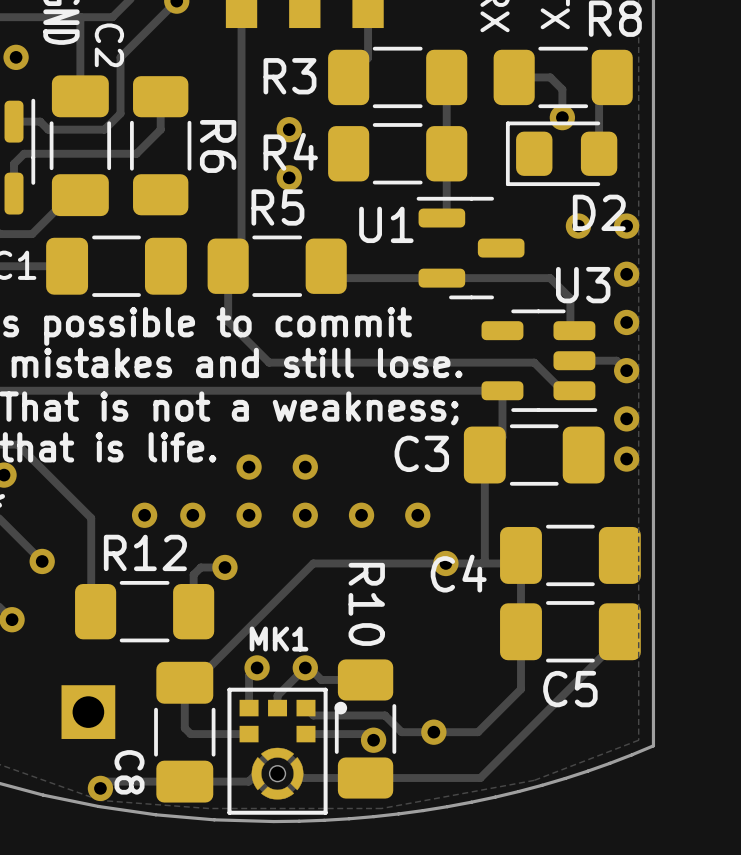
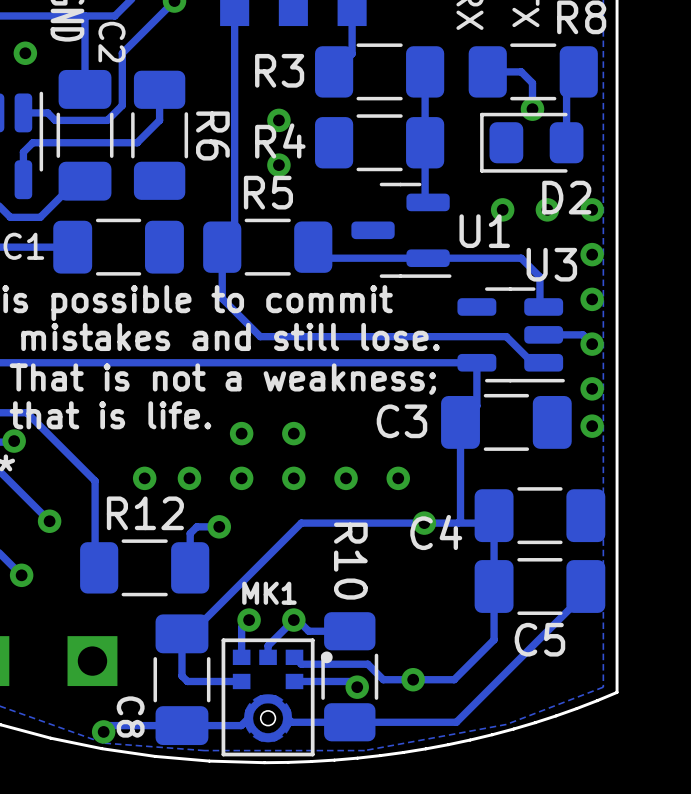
via: none -> (502, 209)
U1 rotation: 0° (470, 248) -> 180° (401, 230)

